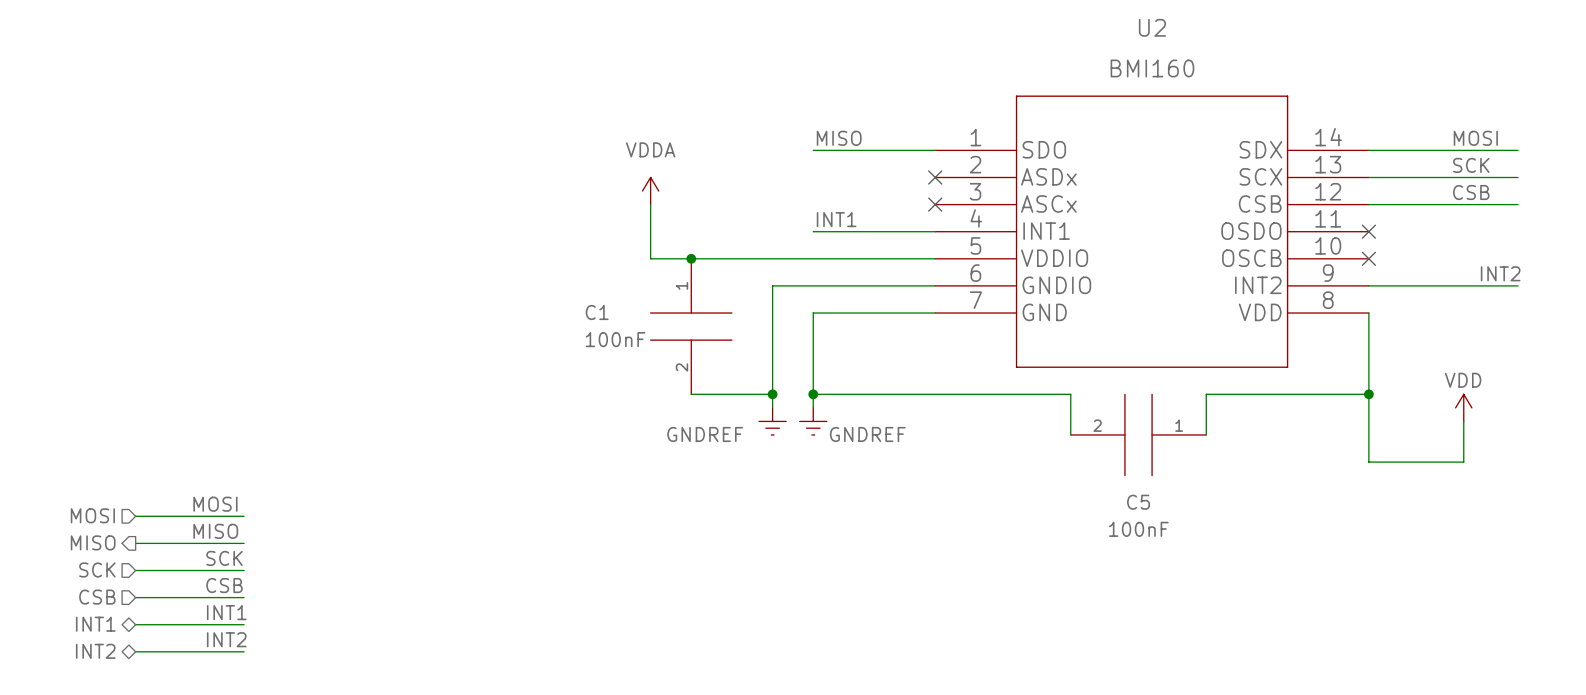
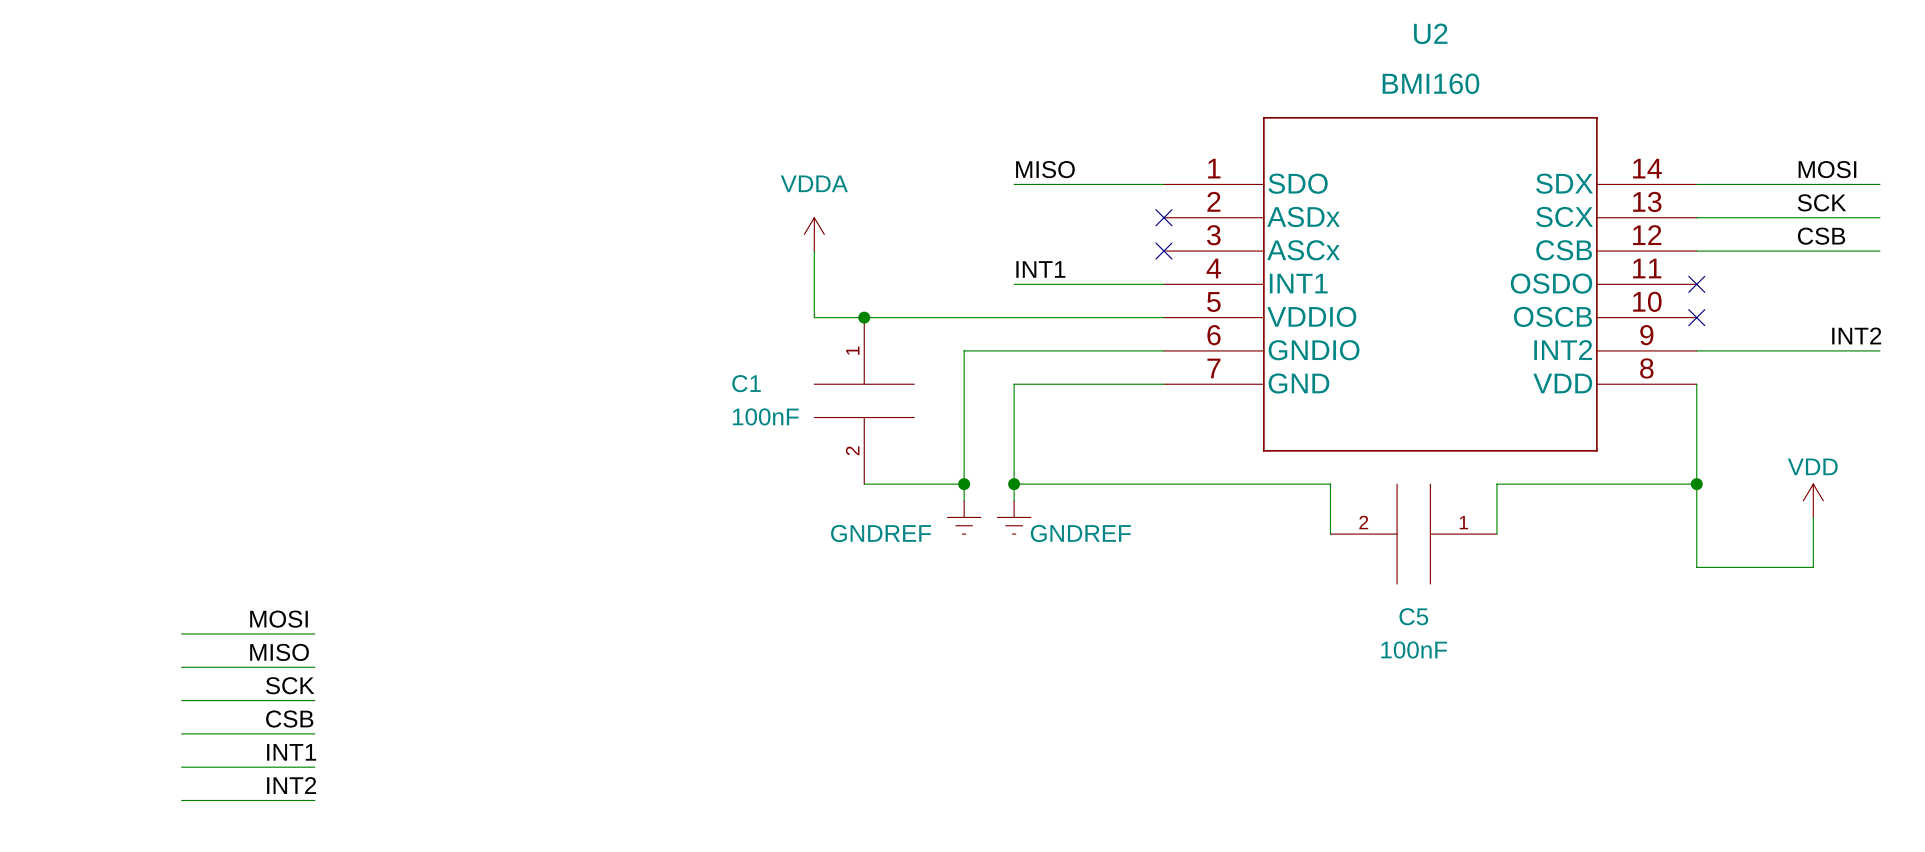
hierarchical label: MOSI (92, 515) -> none
hierarchical label: MISO (93, 542) -> none
hierarchical label: SCK (97, 569) -> none
hierarchical label: CSB (97, 597) -> none
hierarchical label: INT1 (95, 624) -> none
hierarchical label: INT2 (95, 651) -> none

